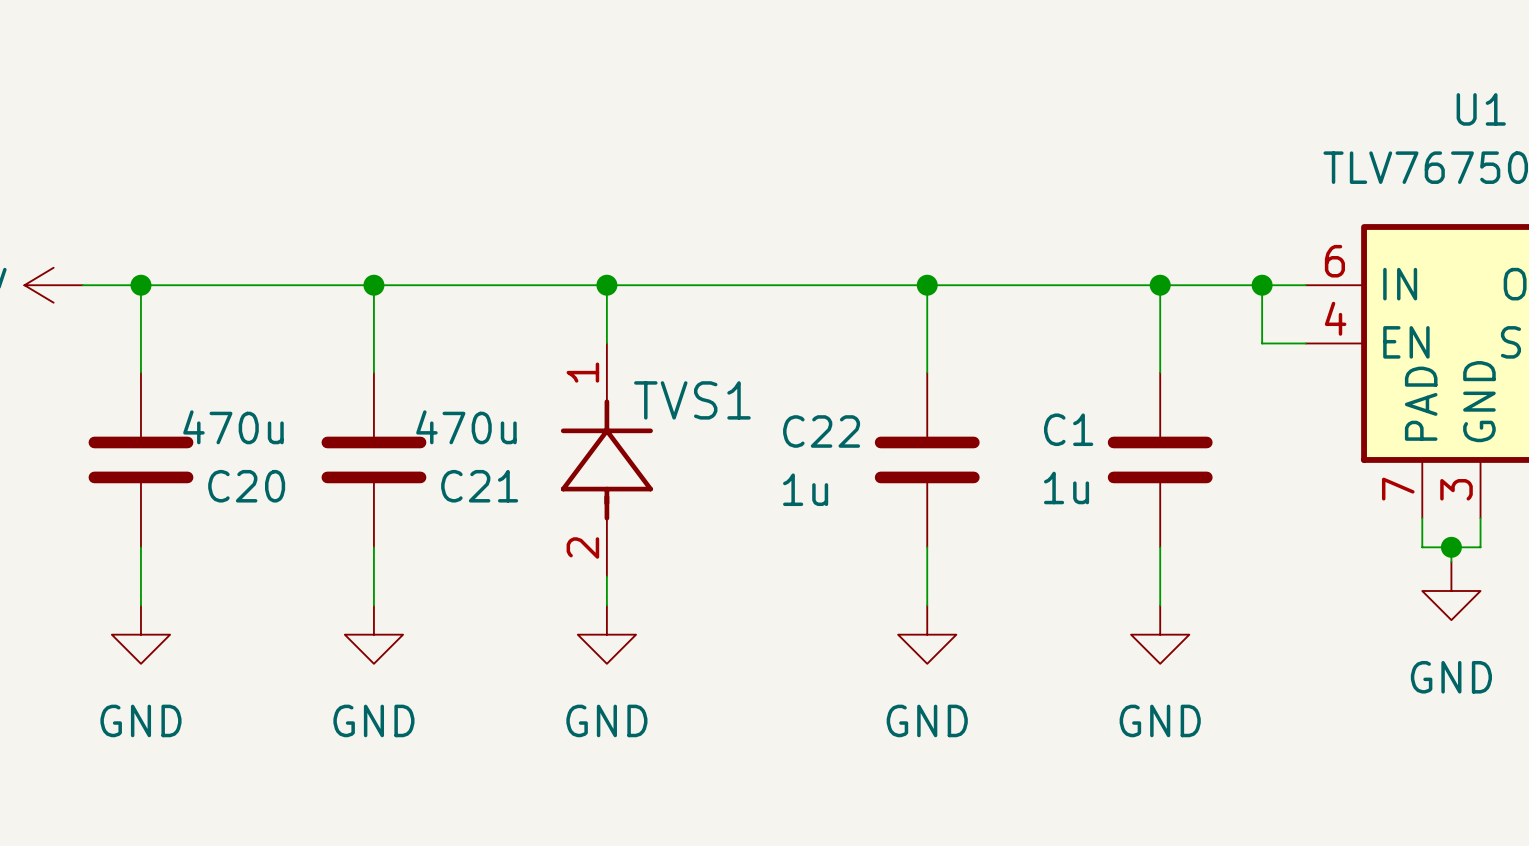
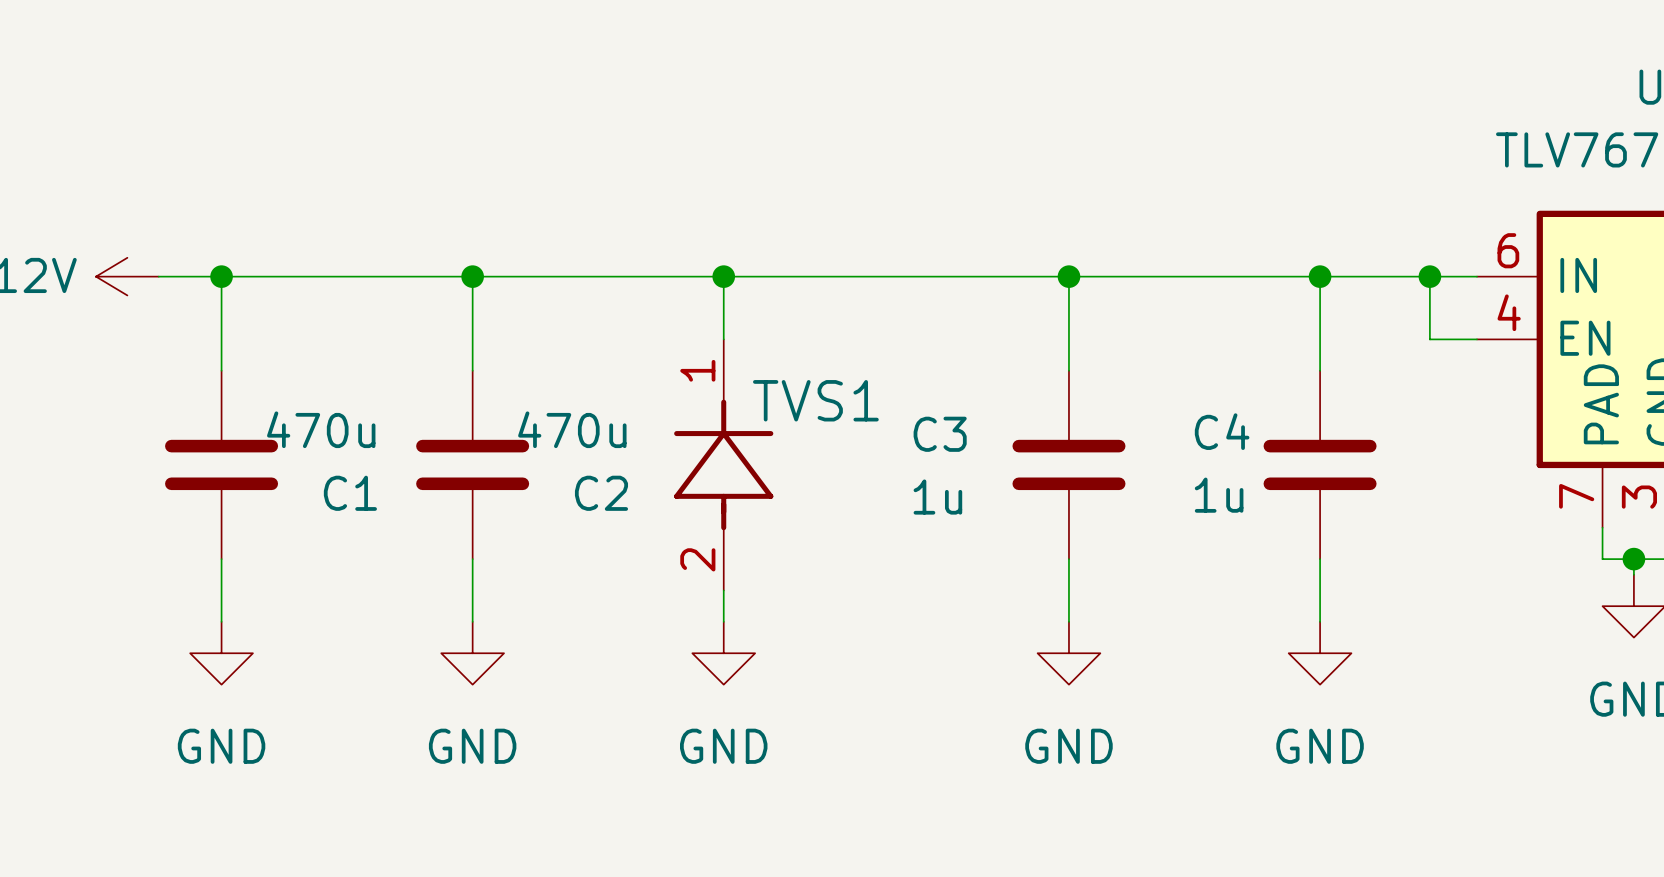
C1 name: C1 (1068, 429) -> C4 (1222, 431)
C22 name: C22 (821, 431) -> C3 (940, 434)
C20 name: C20 (246, 486) -> C1 (350, 493)
C21 name: C21 (479, 486) -> C2 (601, 493)

